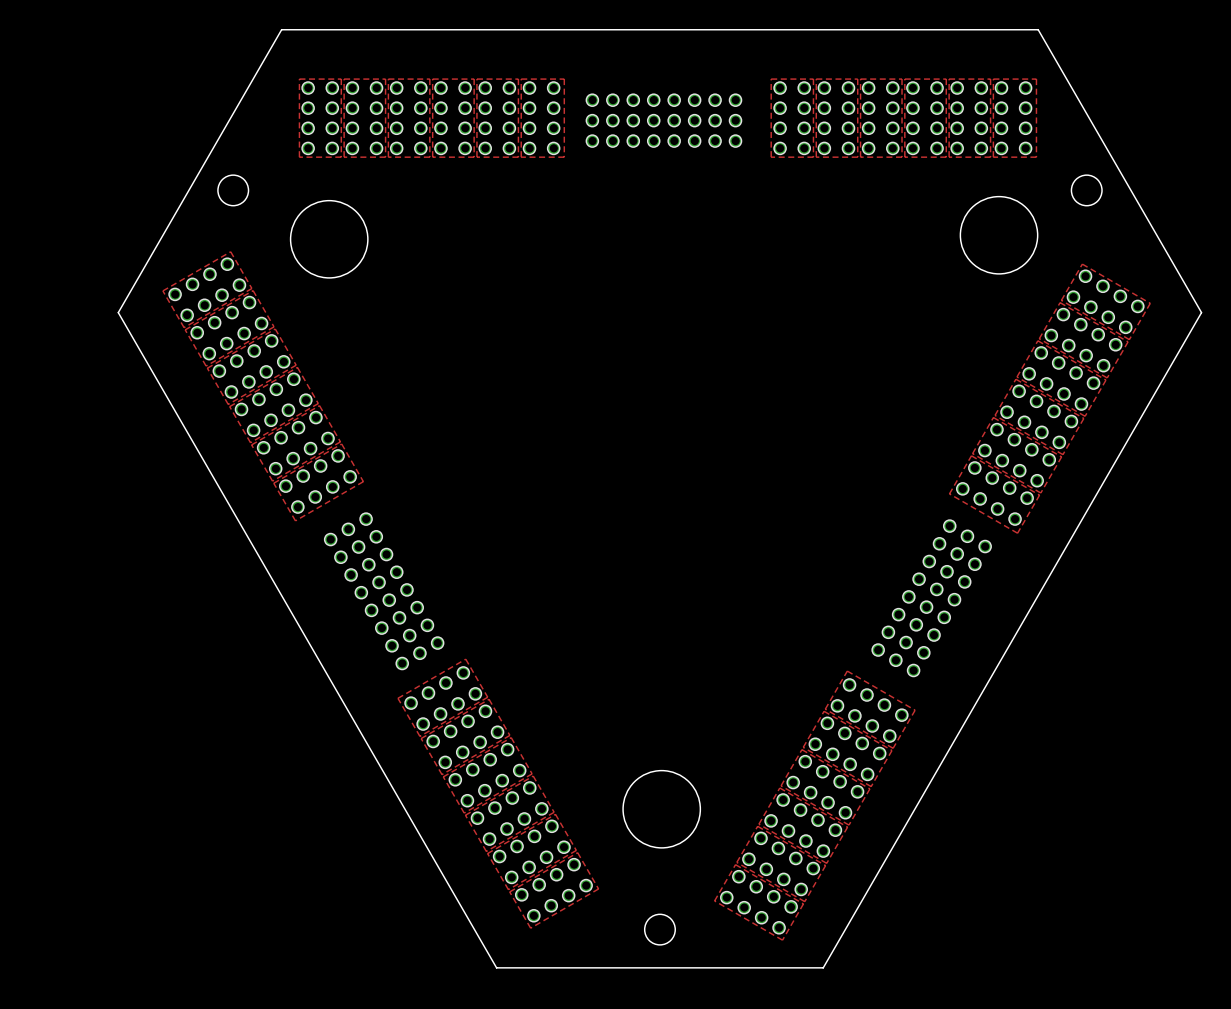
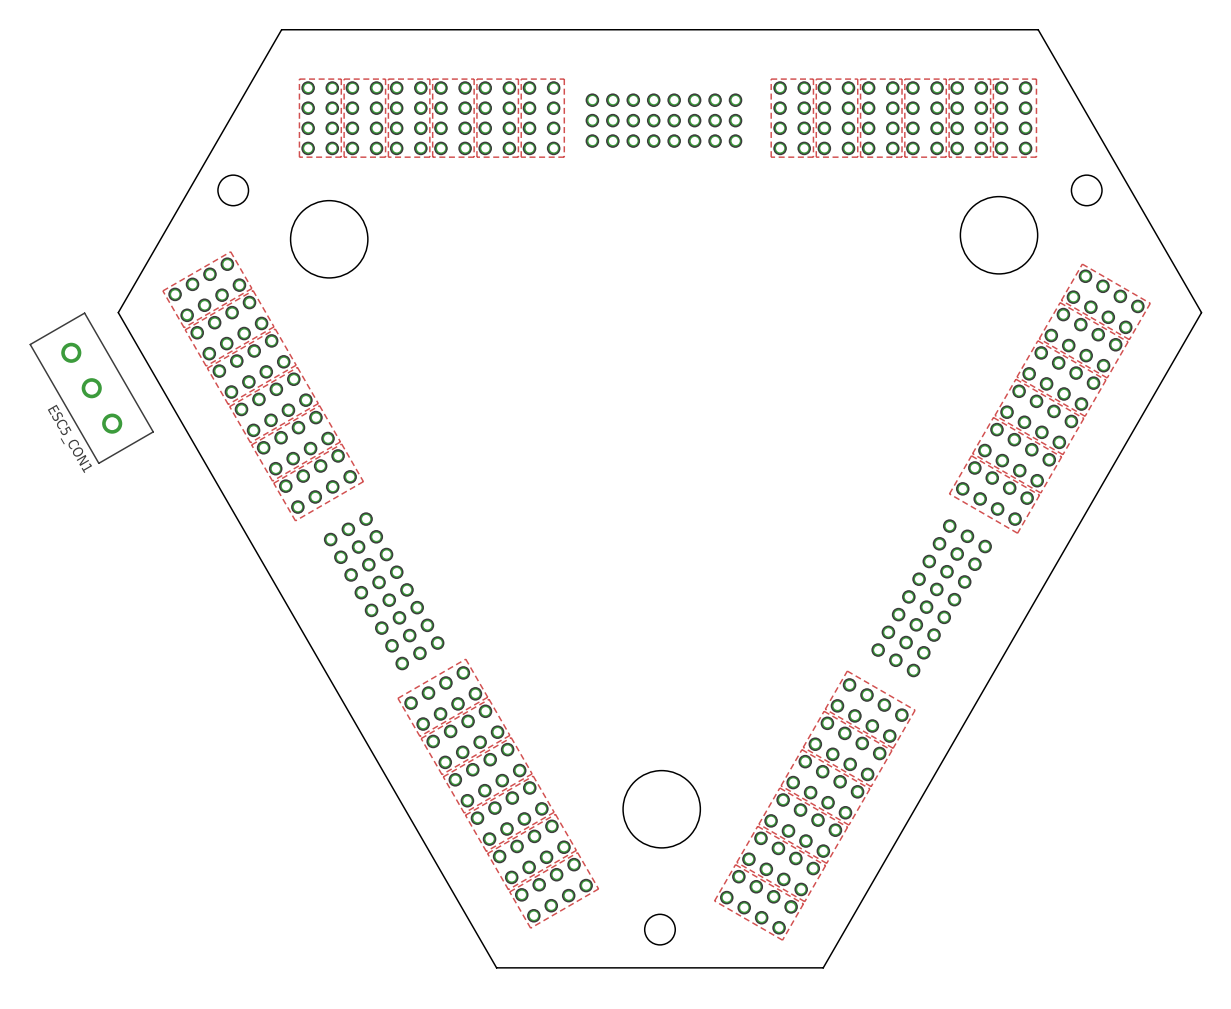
ESC5_CON1: none -> (91, 388)

